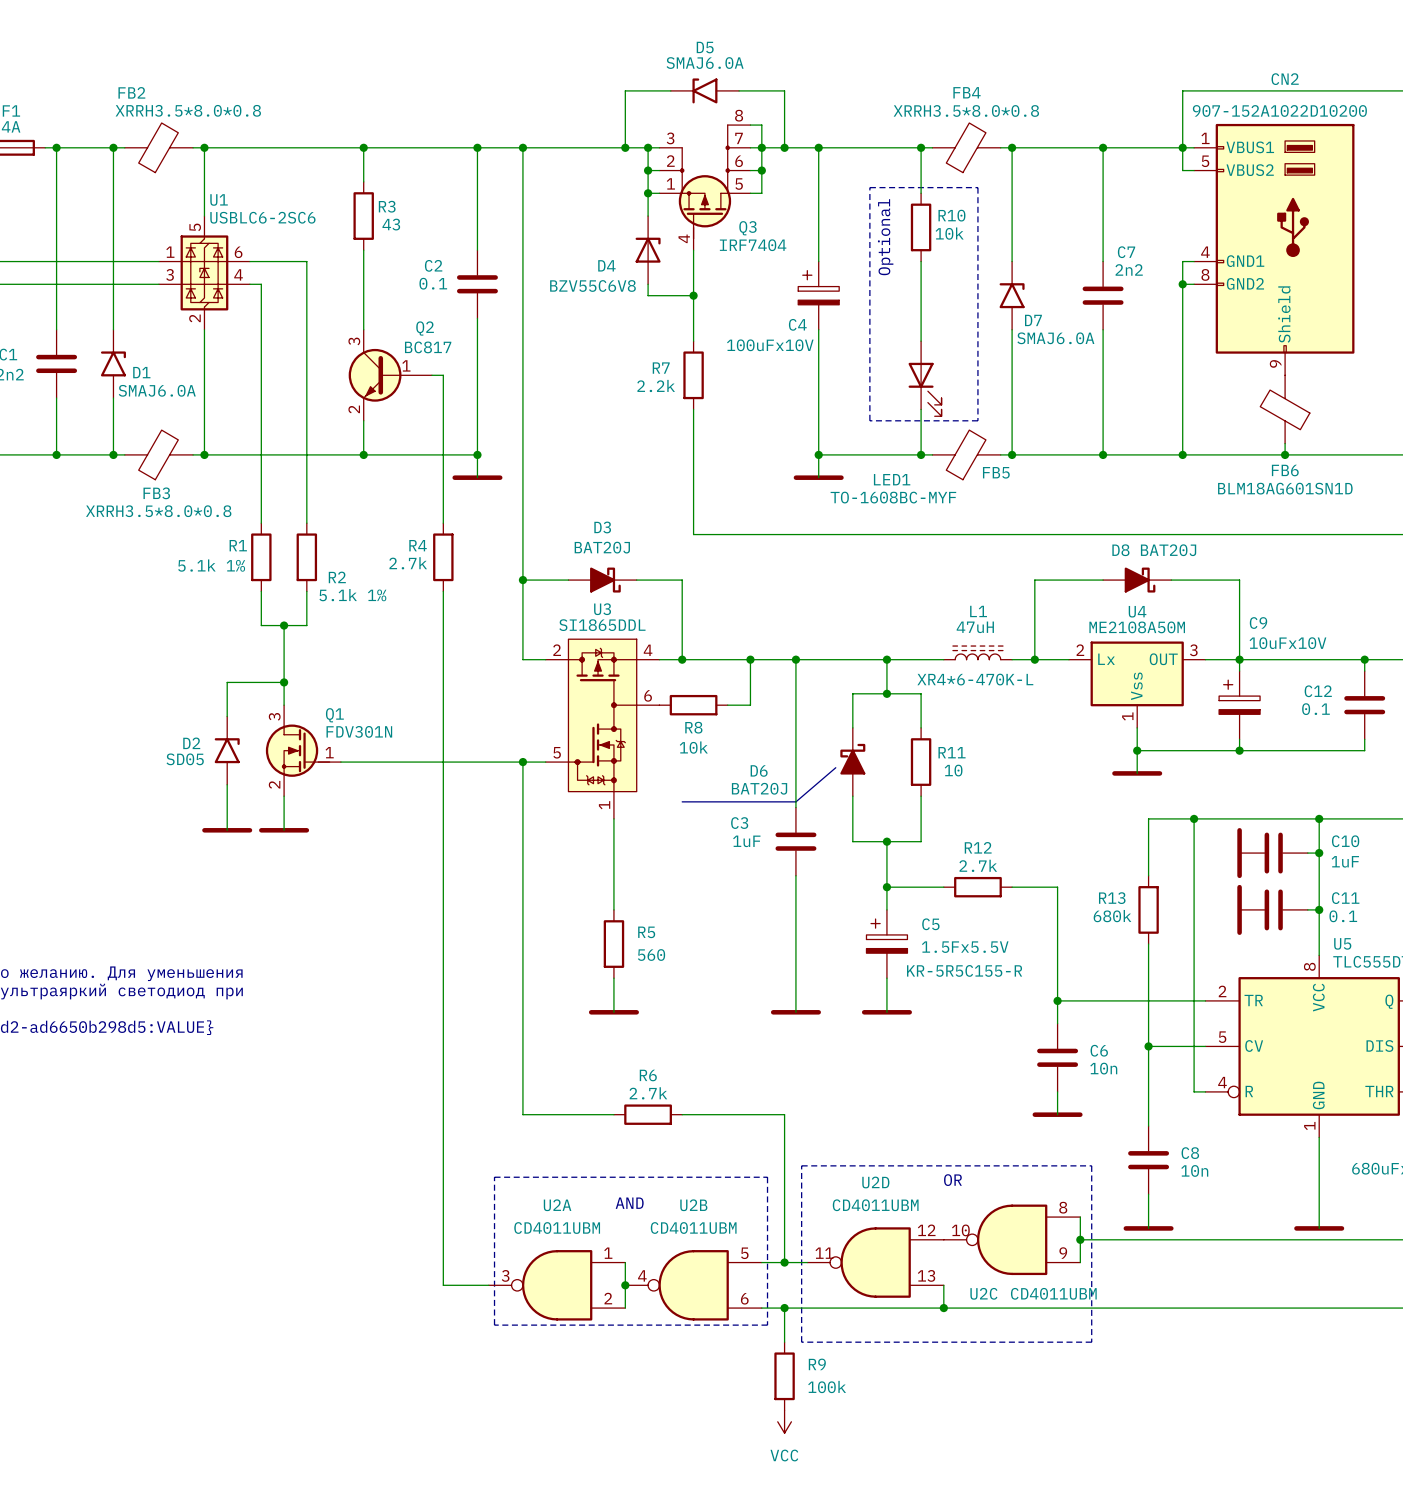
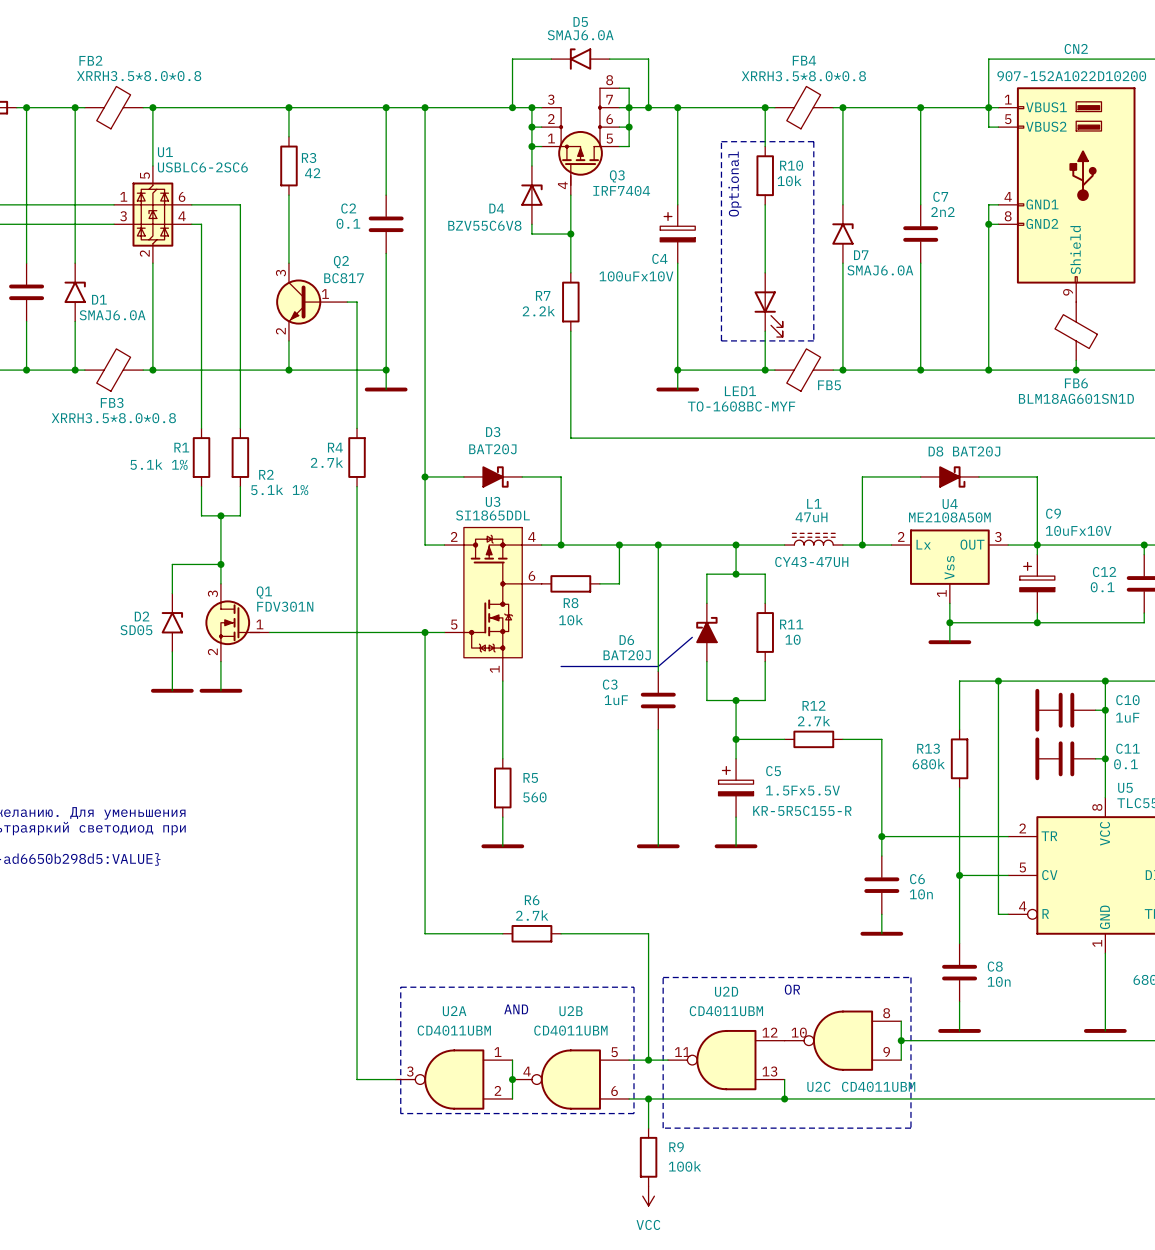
R3 value: 43 (391, 224) -> 42 (312, 173)
L1 text: XR4*6-470K-L (975, 679) -> CY43-47UH (811, 562)

